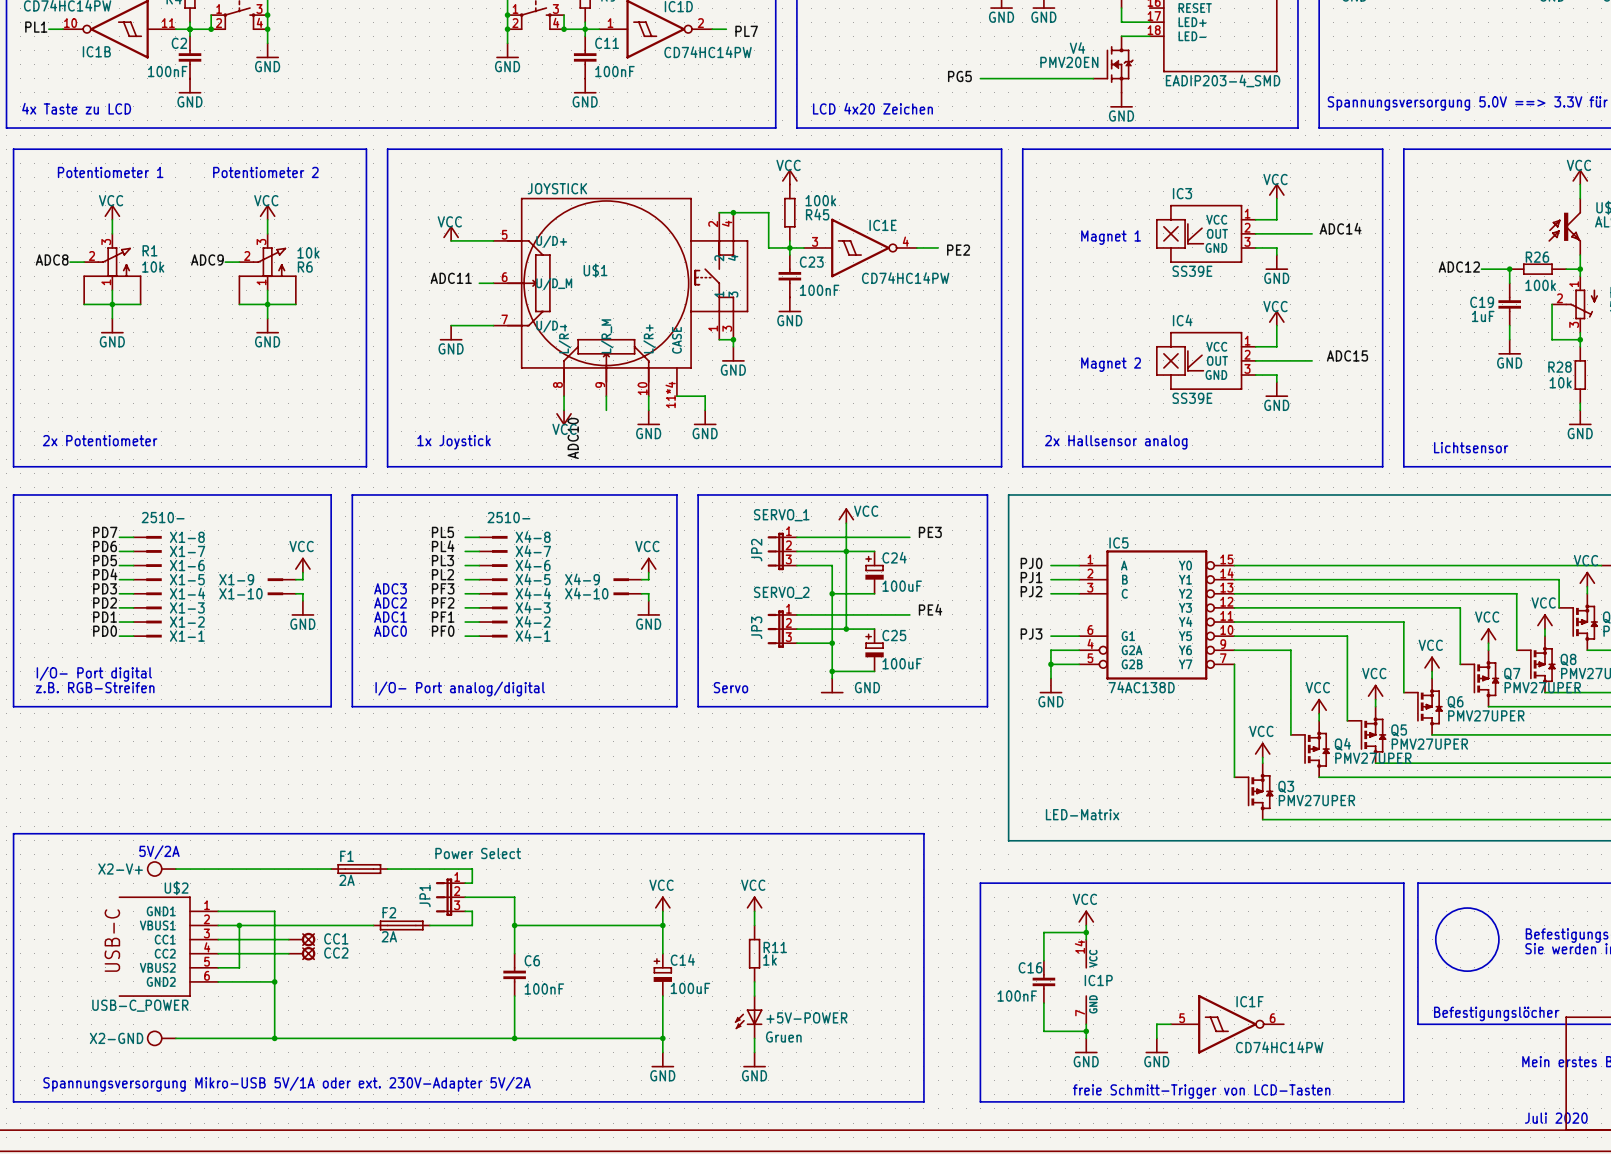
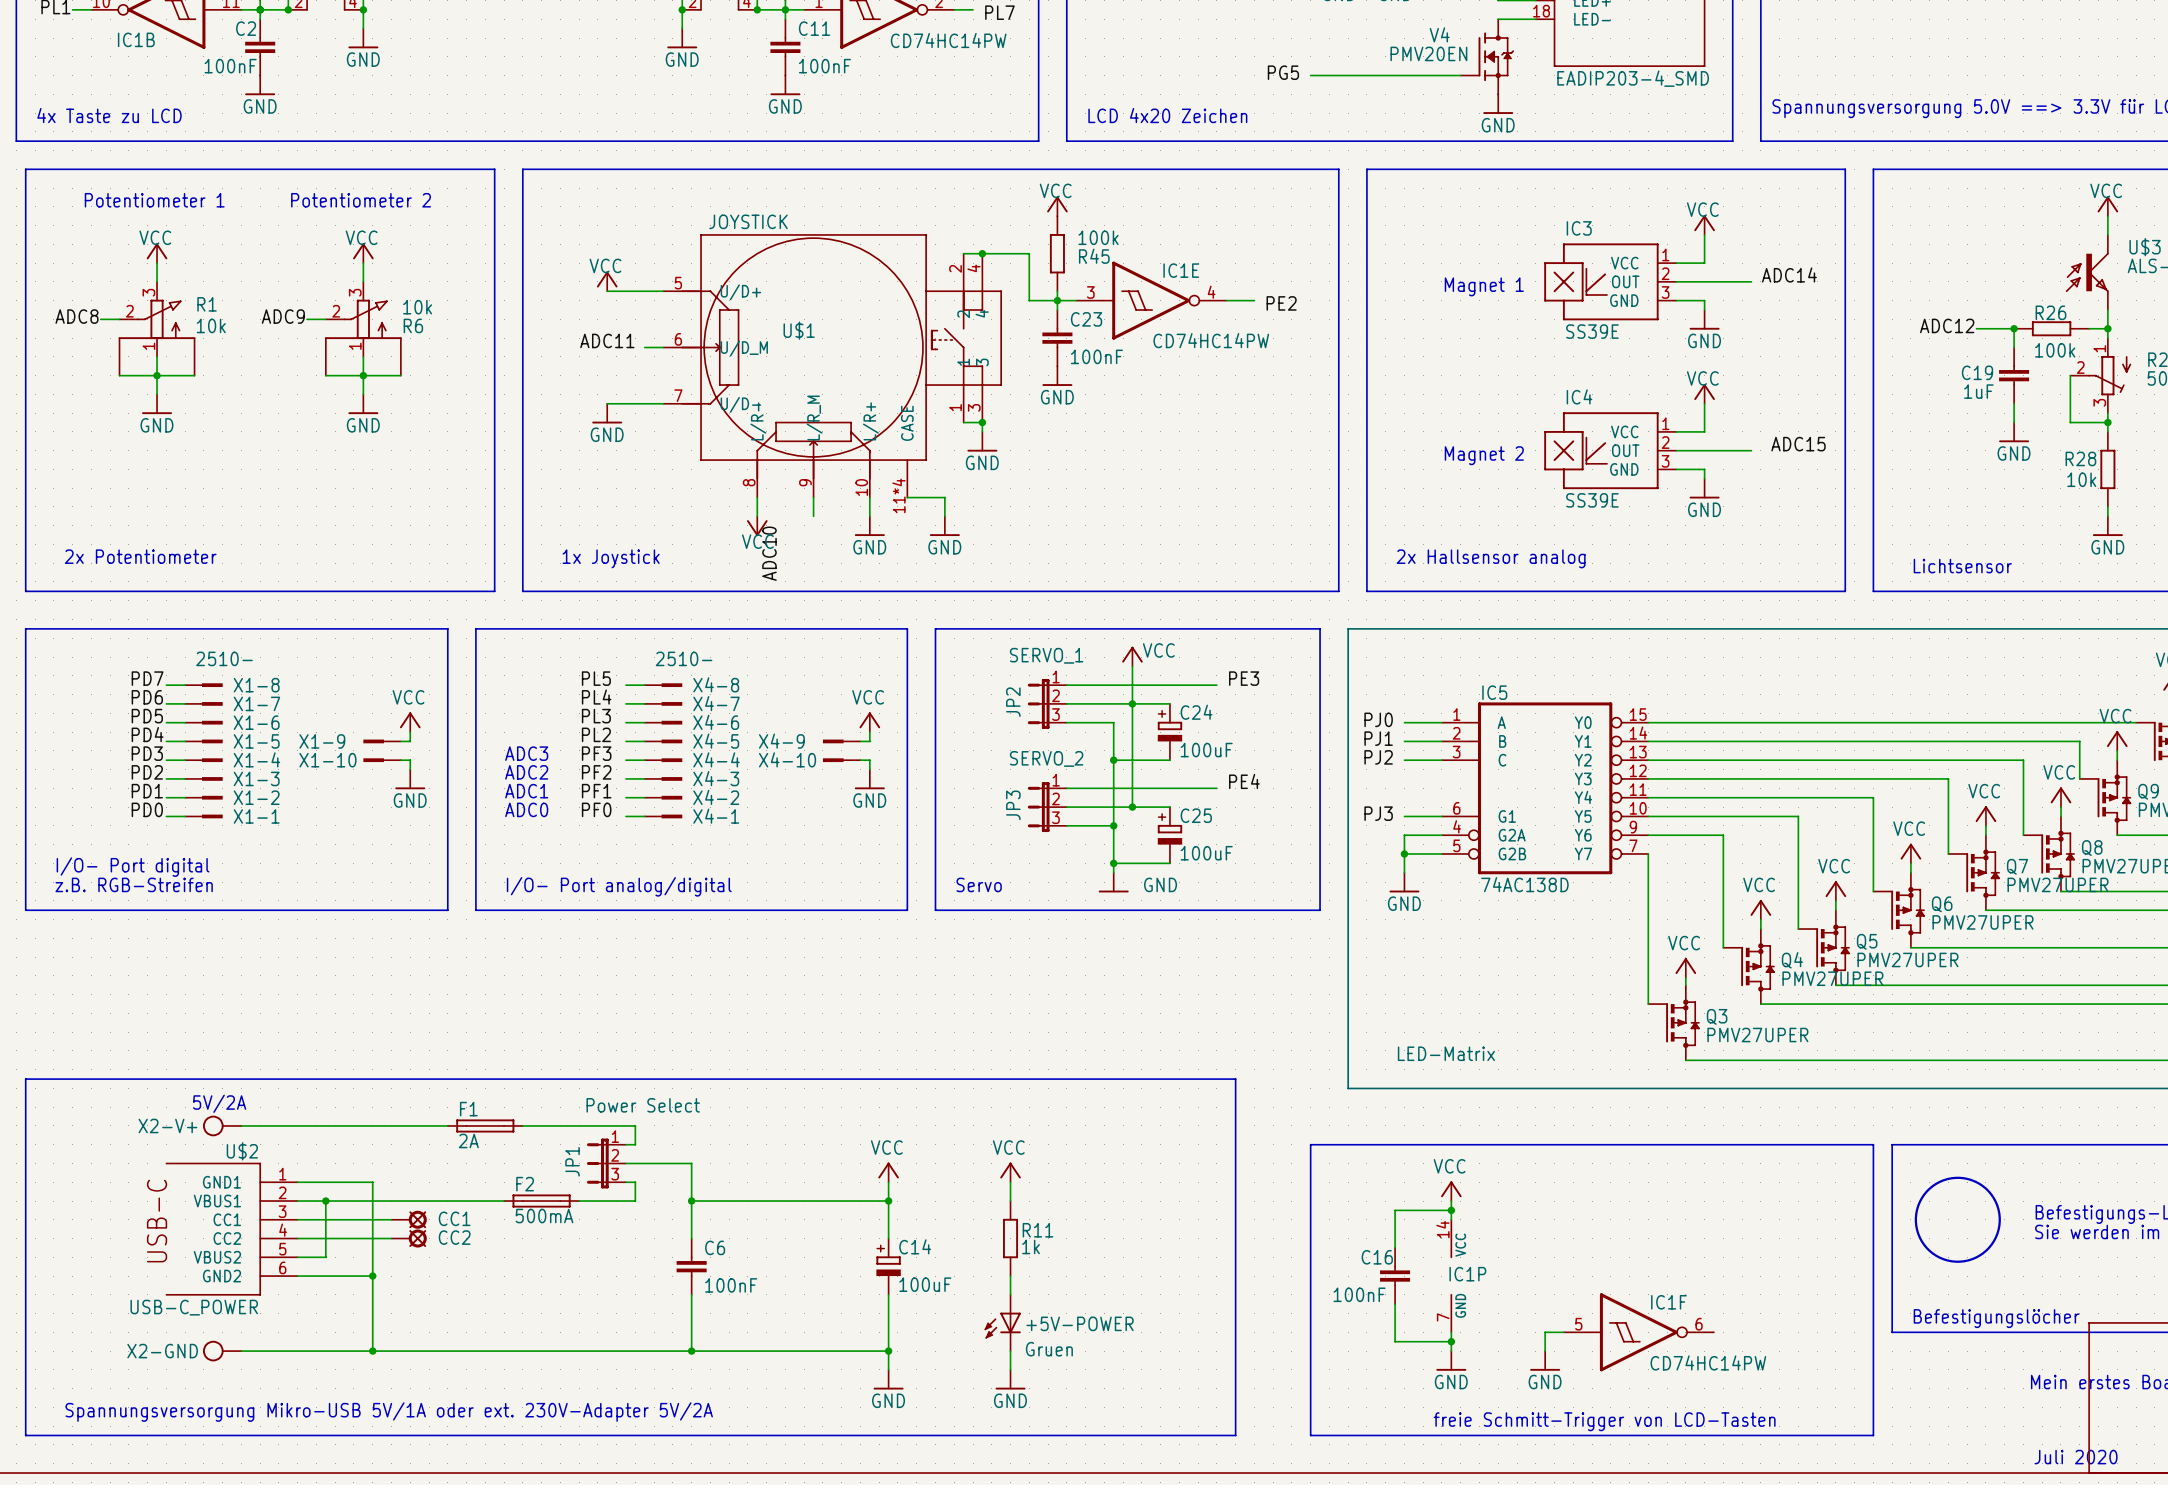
F2 value: 2A (389, 936) -> 500mA (544, 1216)

